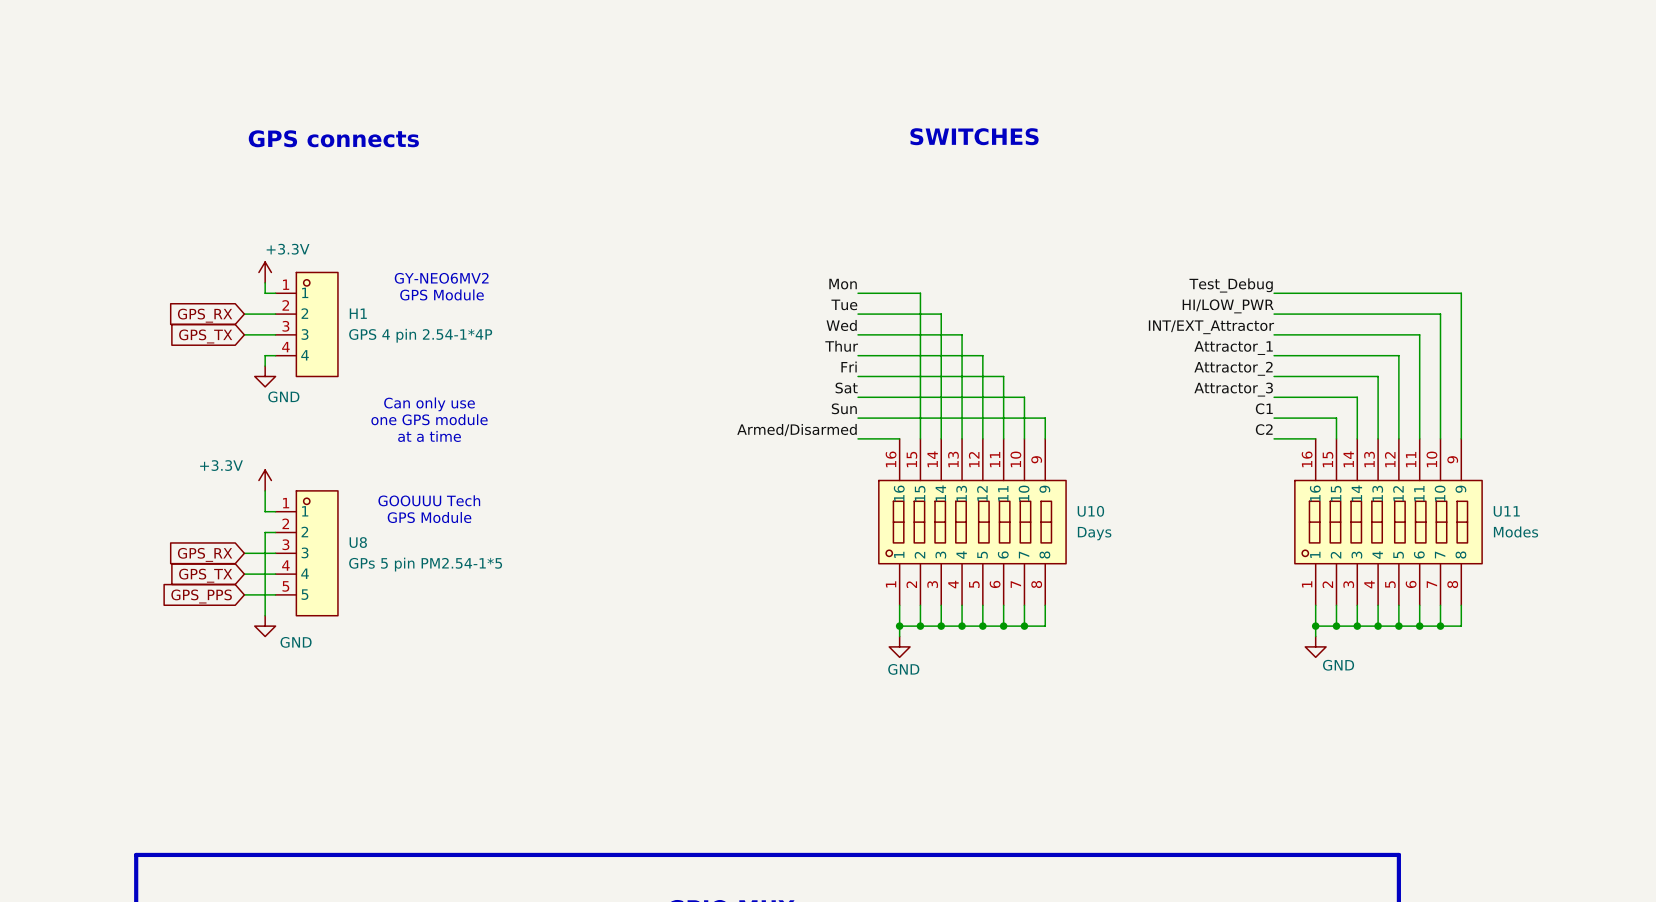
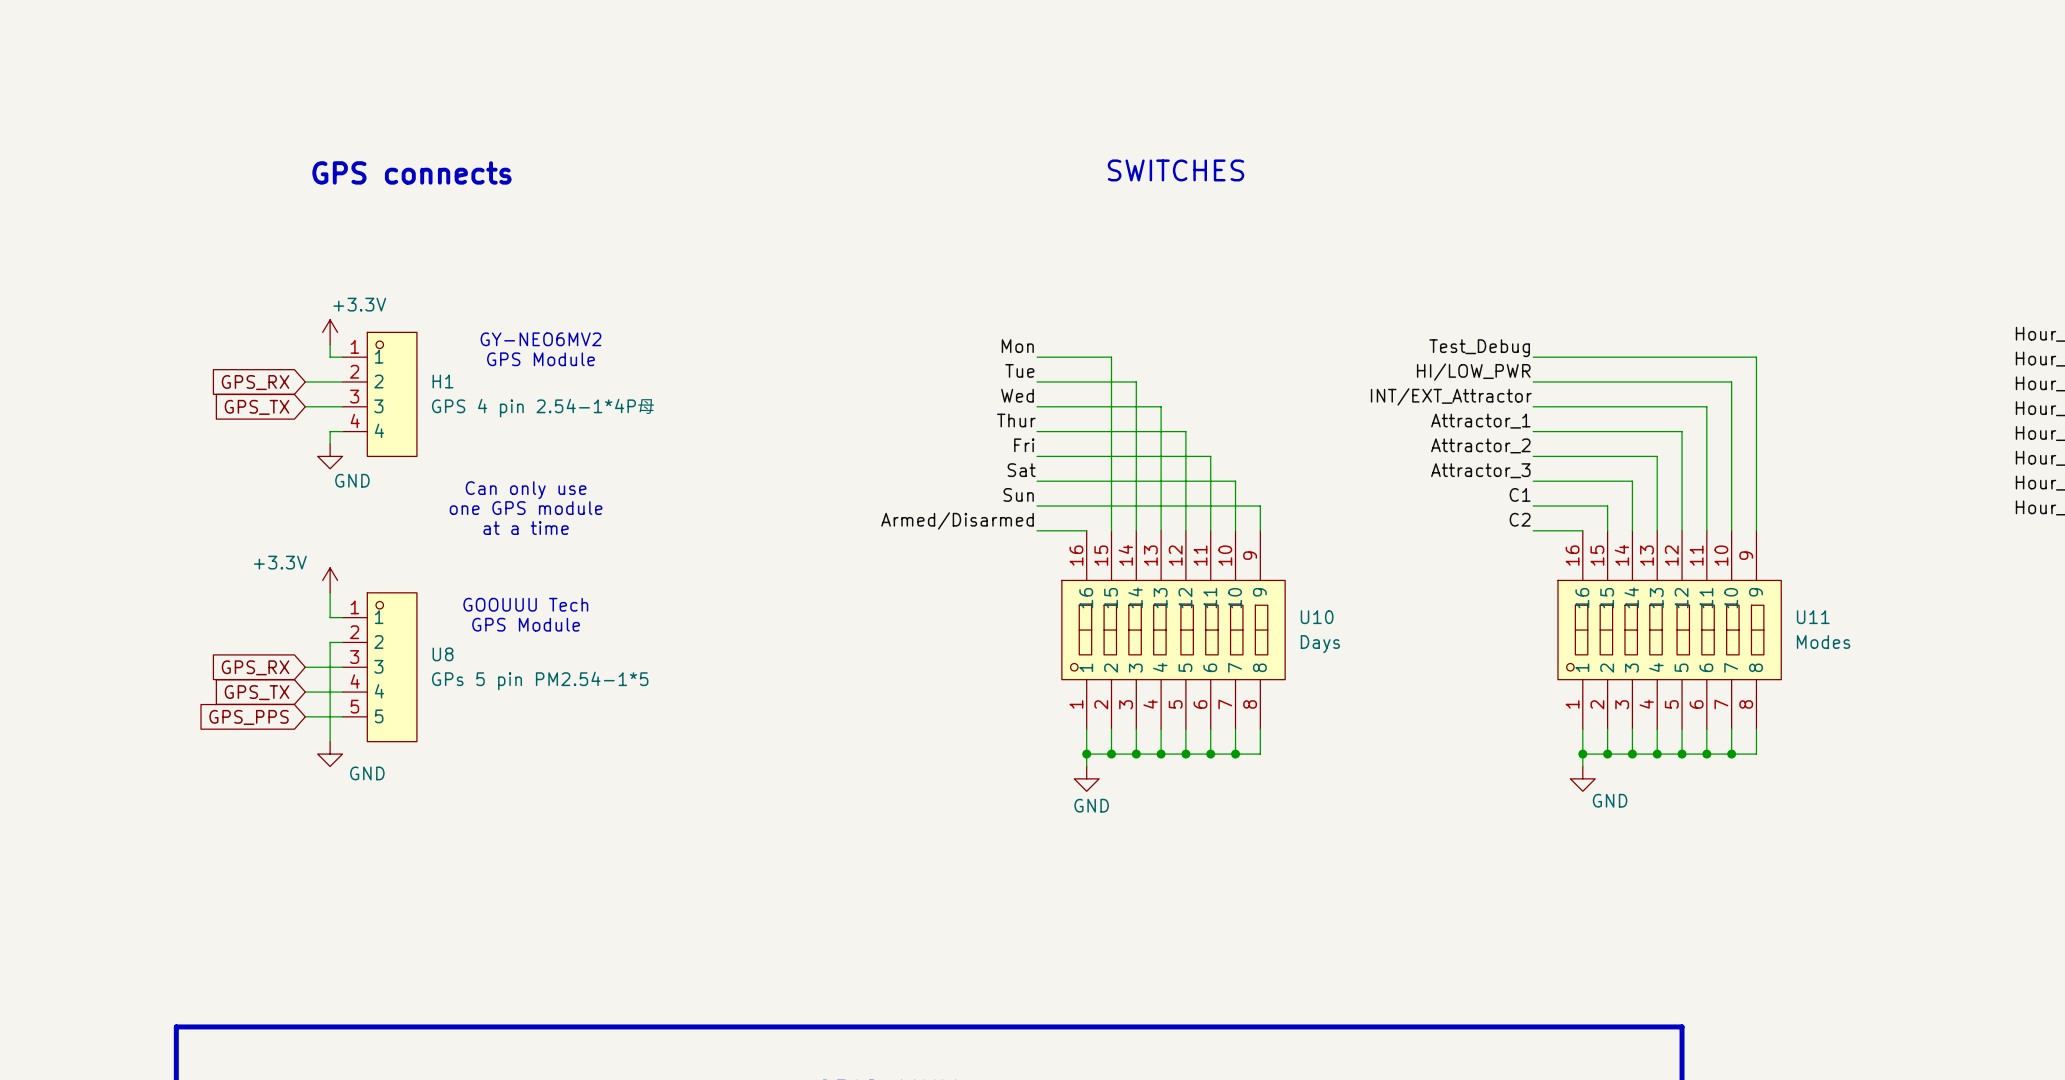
H1 value: GPS 4 pin 2.54-1*4P (420, 335) -> GPS 4 pin 2.54-1*4P母 (543, 407)

